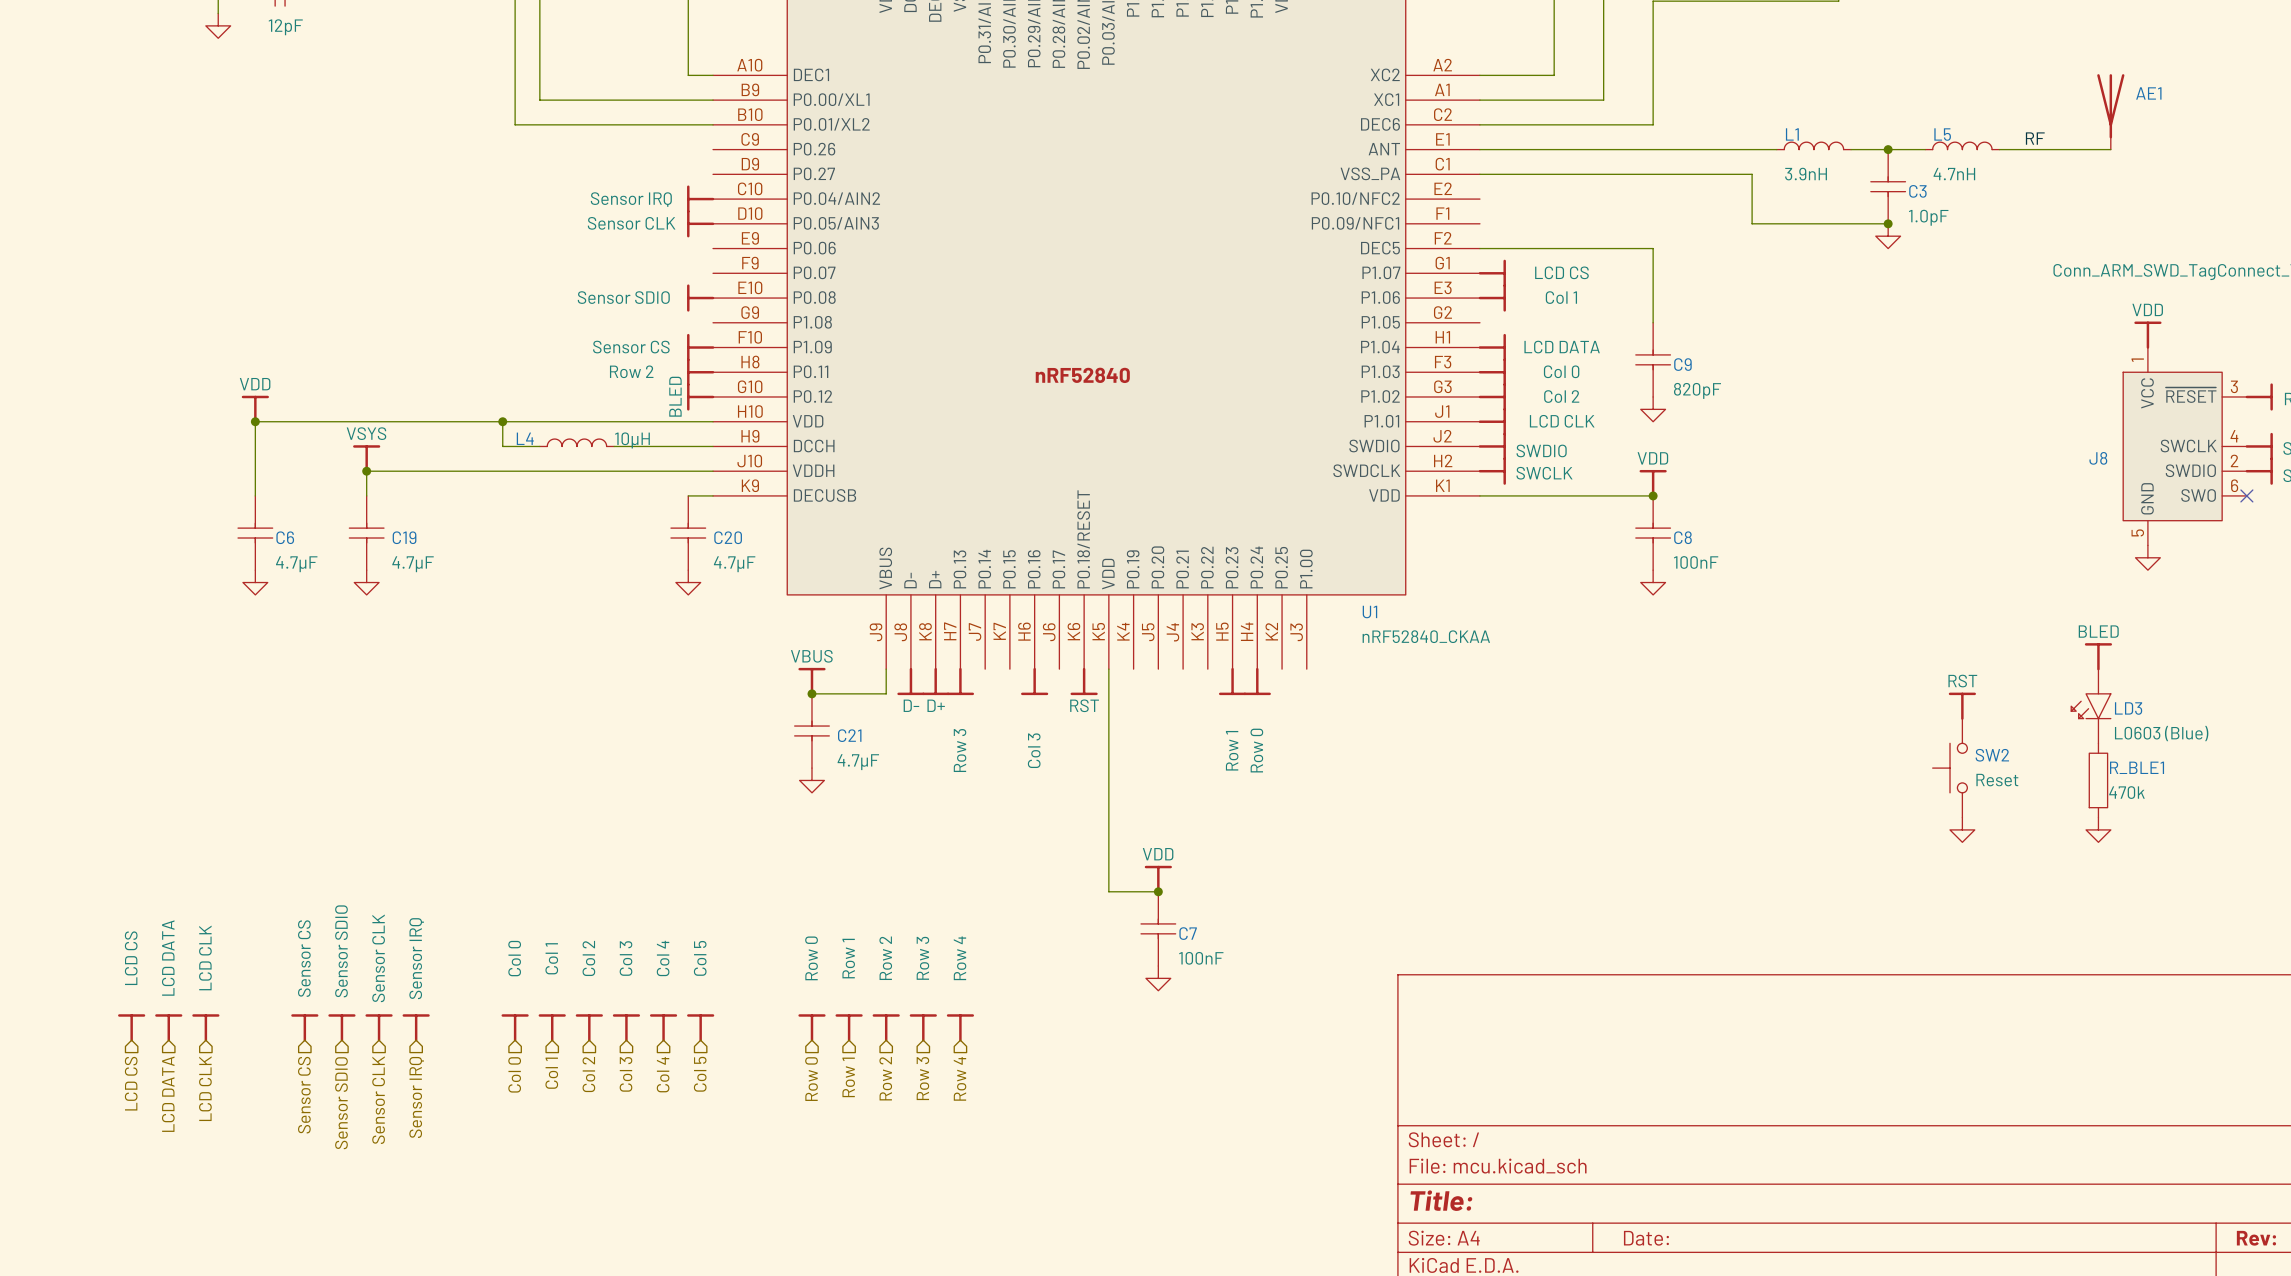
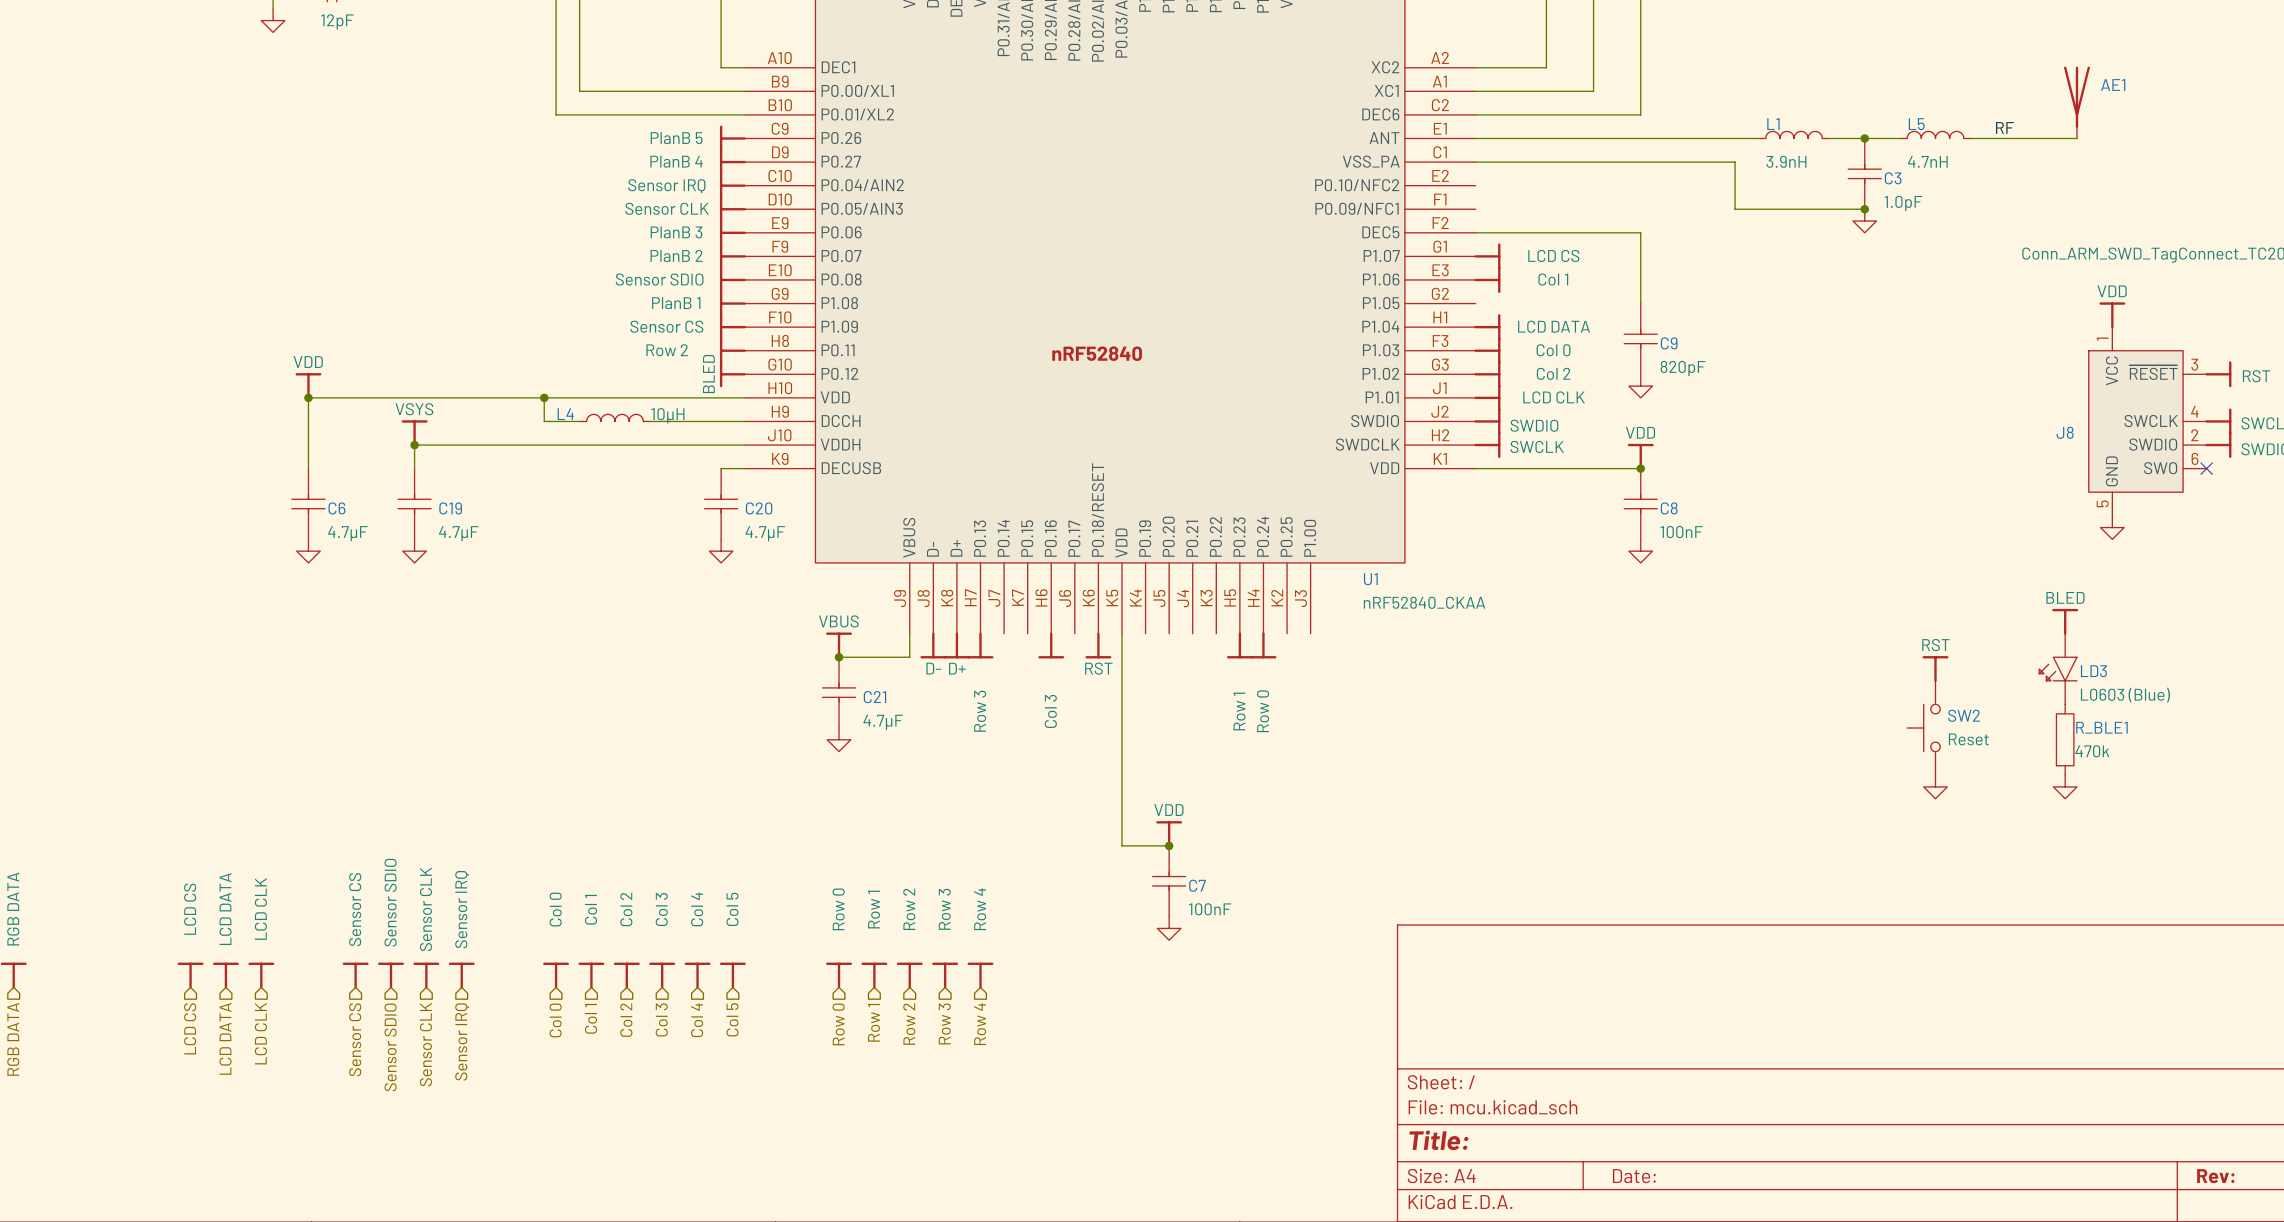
power symbol: none -> PlanB 5 (732, 138)
power symbol: none -> PlanB 4 (732, 162)
power symbol: none -> PlanB 3 (732, 232)
power symbol: none -> PlanB 2 (732, 256)
power symbol: none -> PlanB 1 (732, 303)

